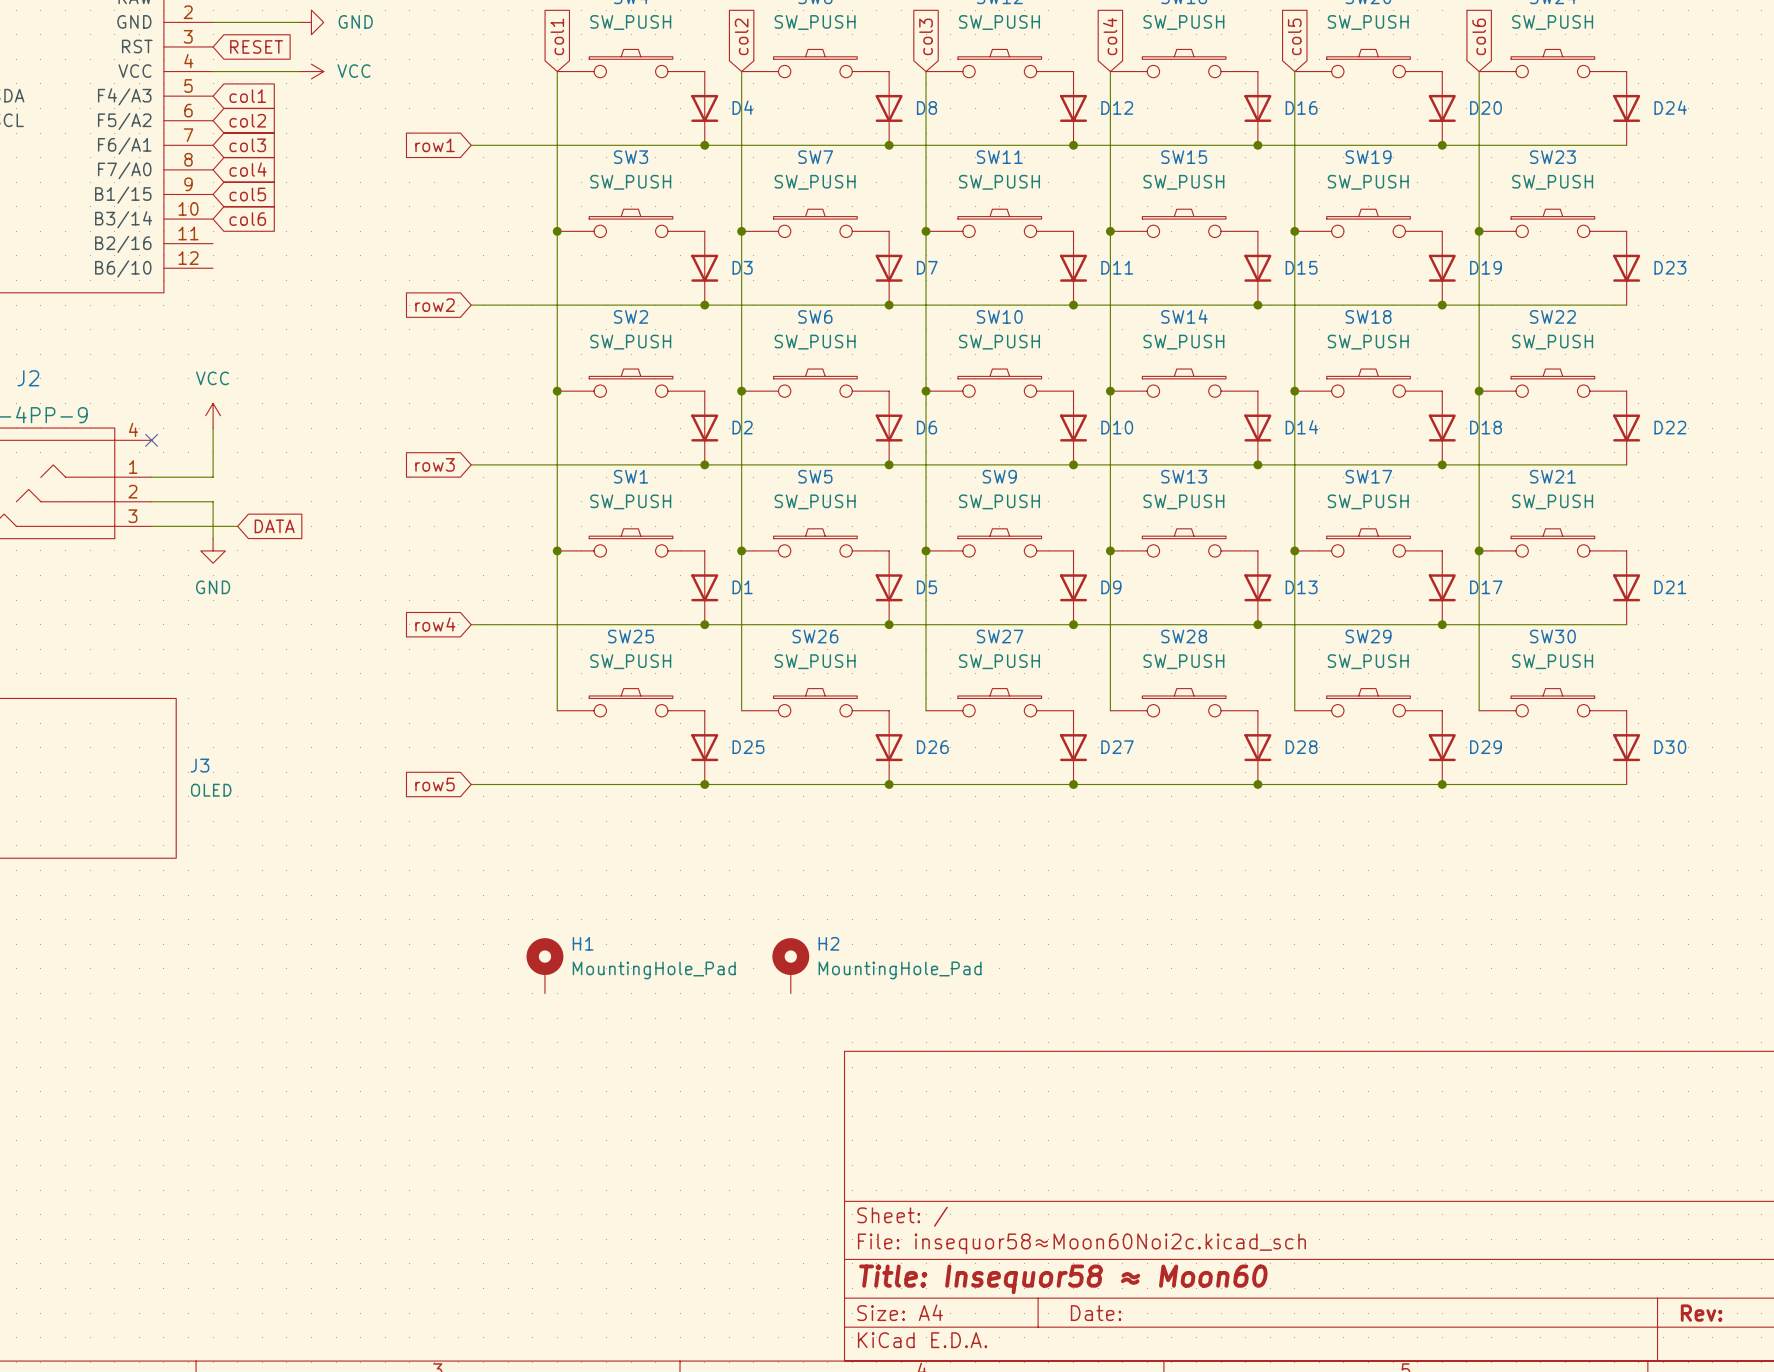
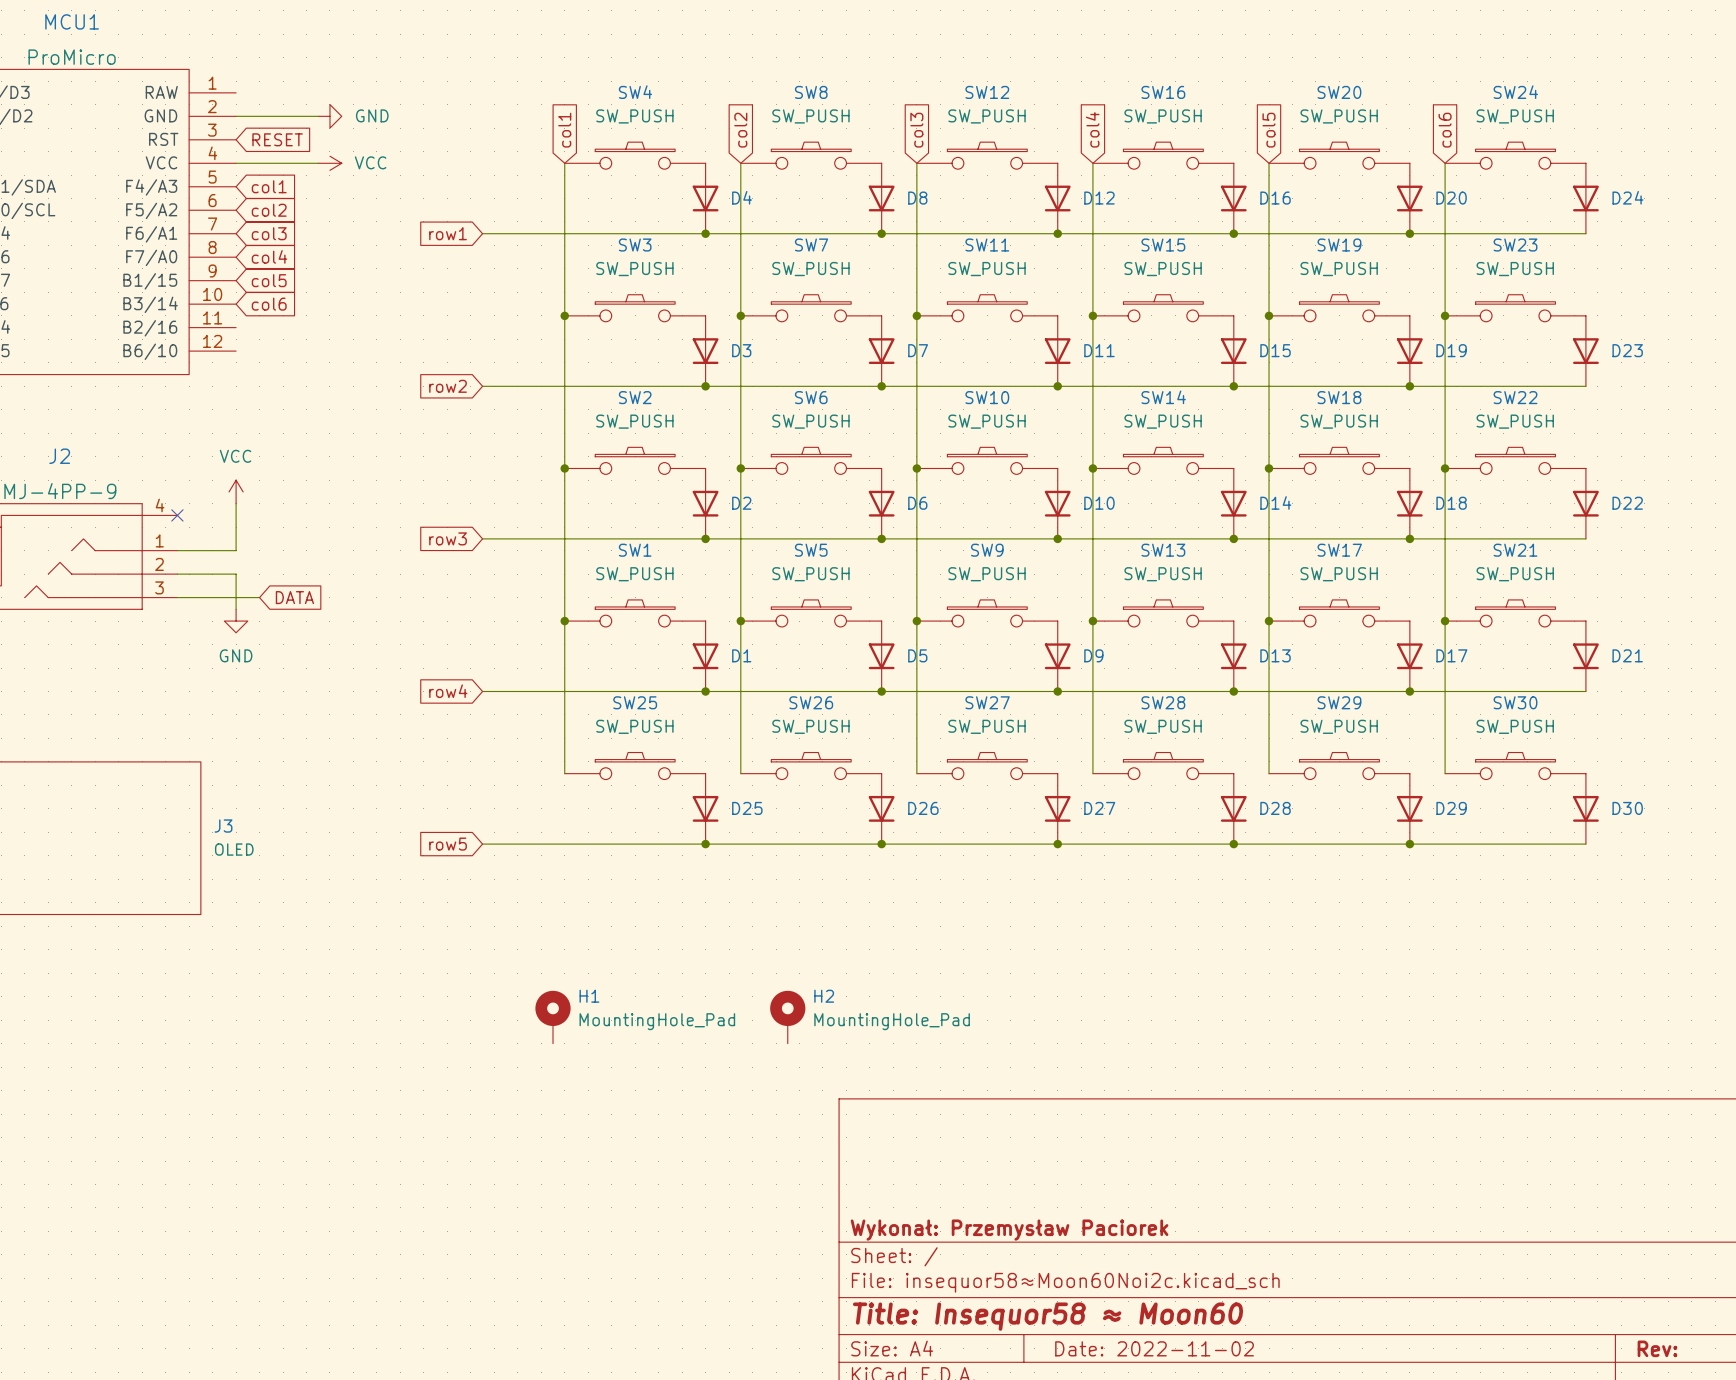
title block: none -> Wykonał: Przemysław Paciorek (1009, 1230)
title block: Date: (1096, 1313) -> Date: 2022-11-02 (1154, 1348)

